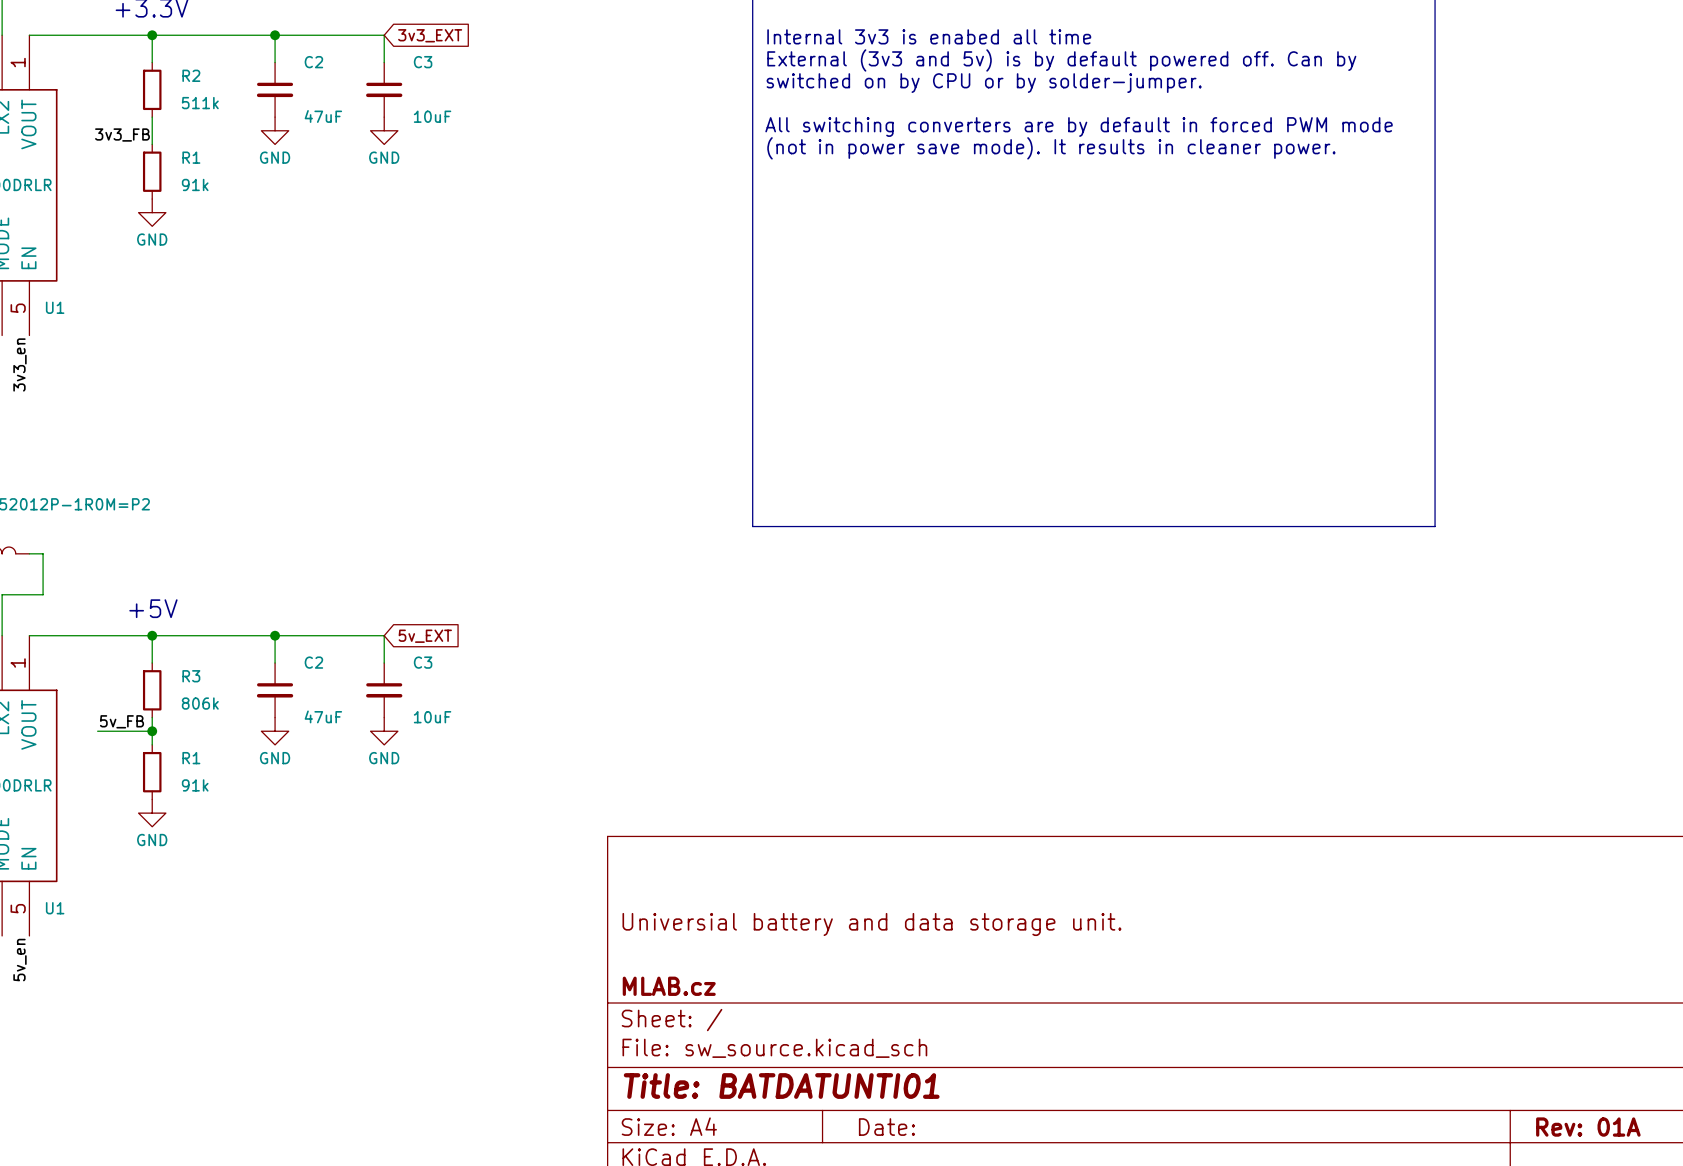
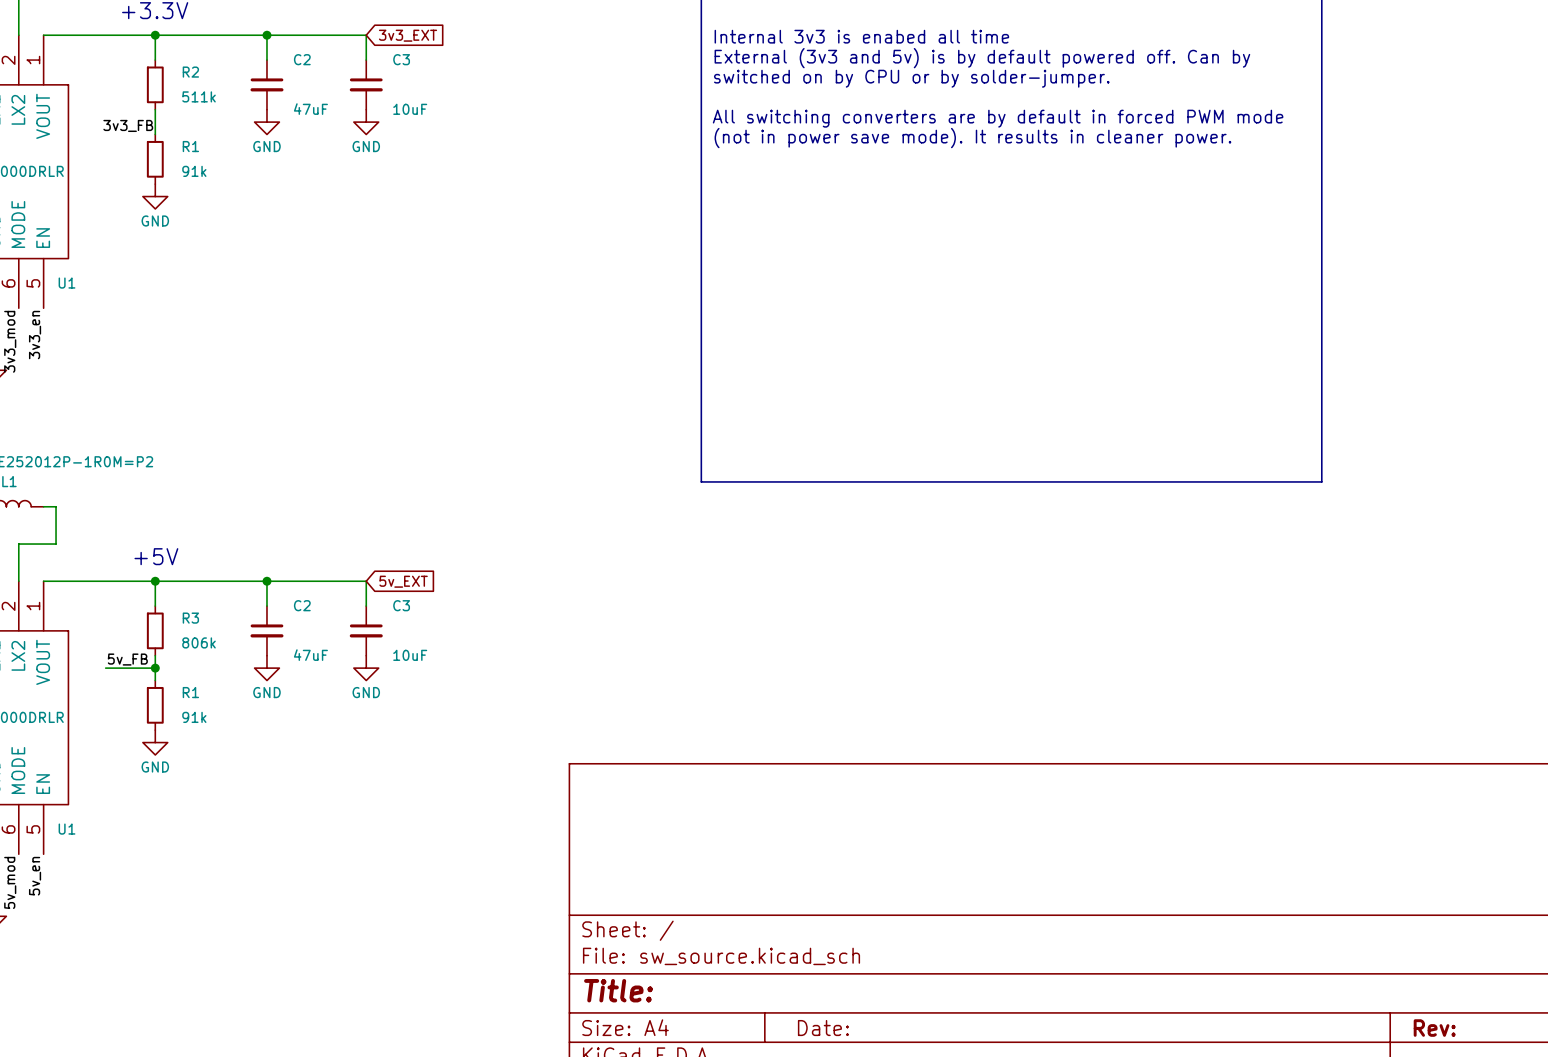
title block: Universial battery and data storage unit. (871, 924) -> none
title block: MLAB.cz (669, 986) -> none
title block: Title: BATDATUNTI01 (781, 1086) -> Title: (618, 990)
title block: Rev: 01A (1588, 1127) -> Rev: (1434, 1028)

